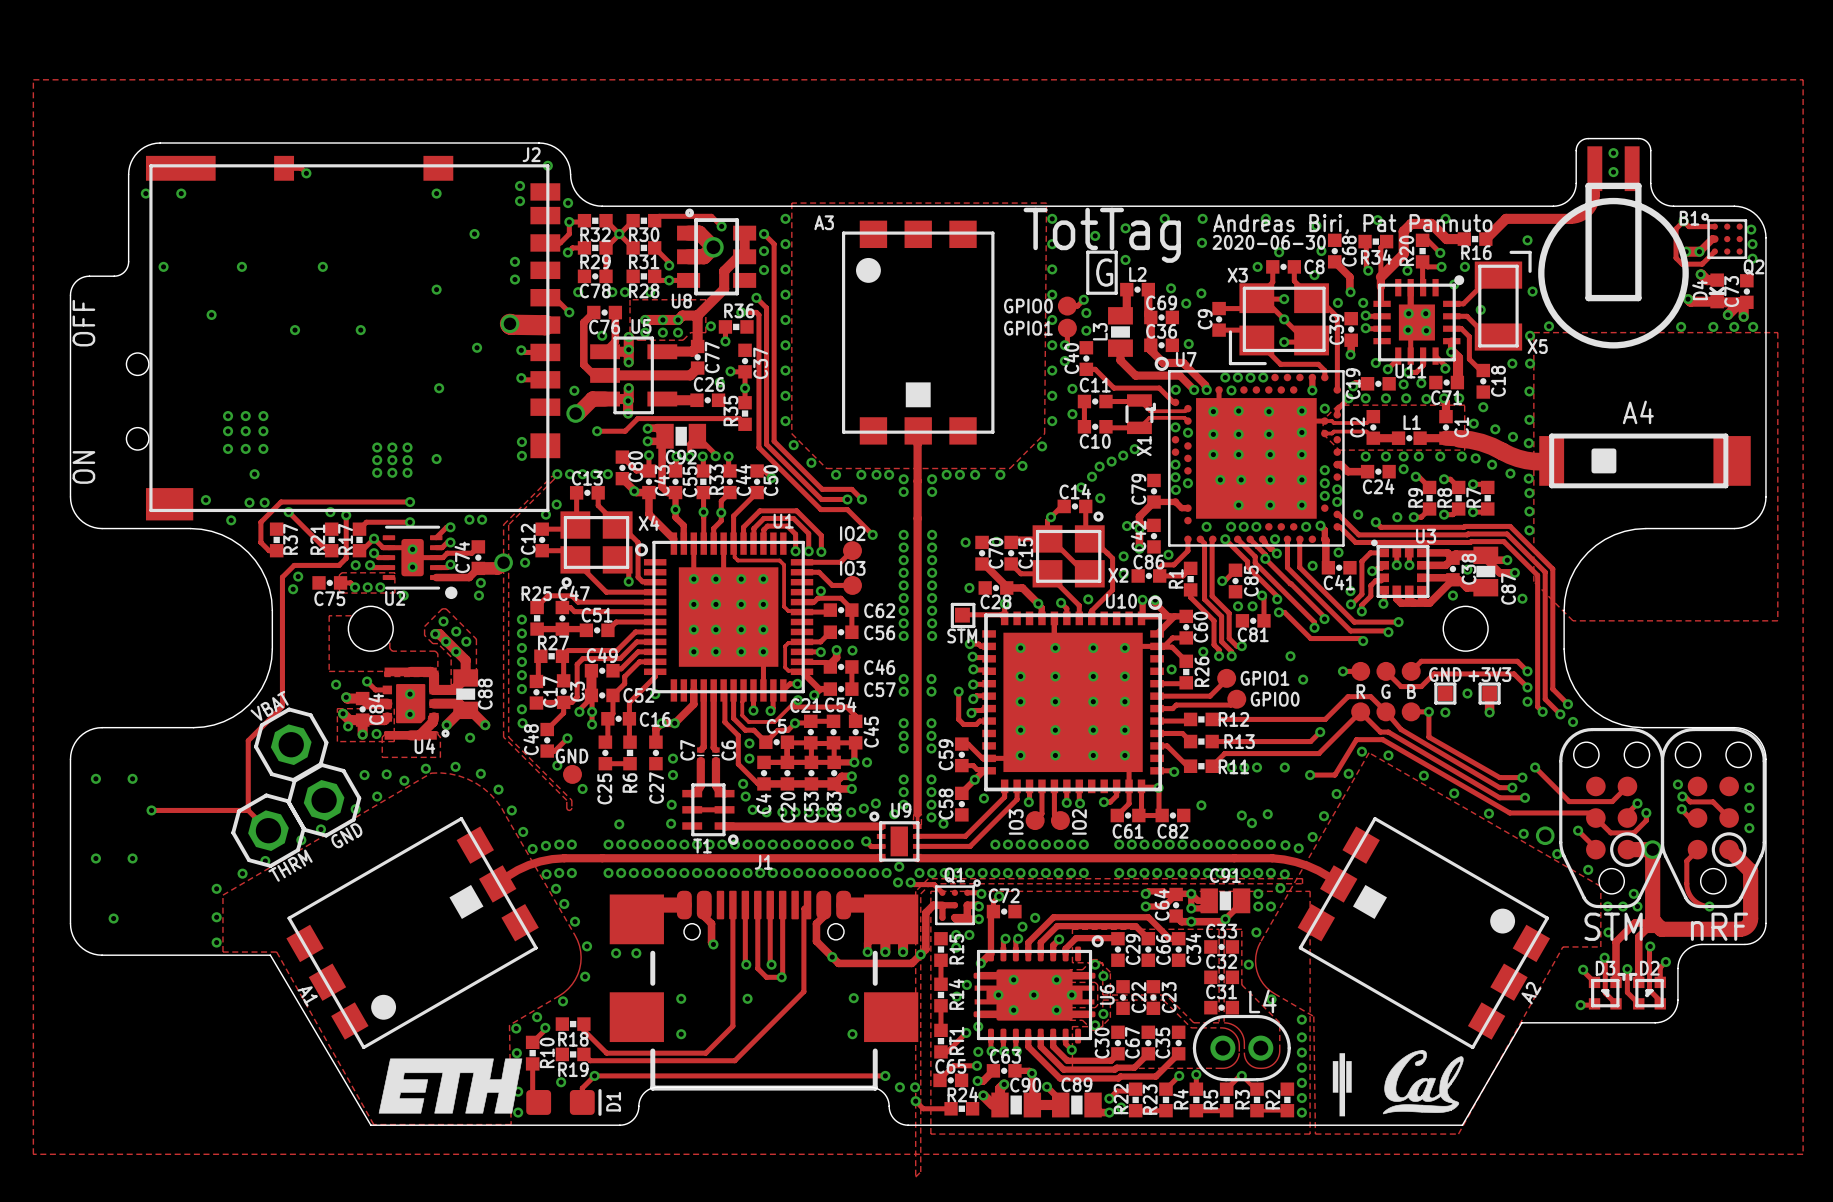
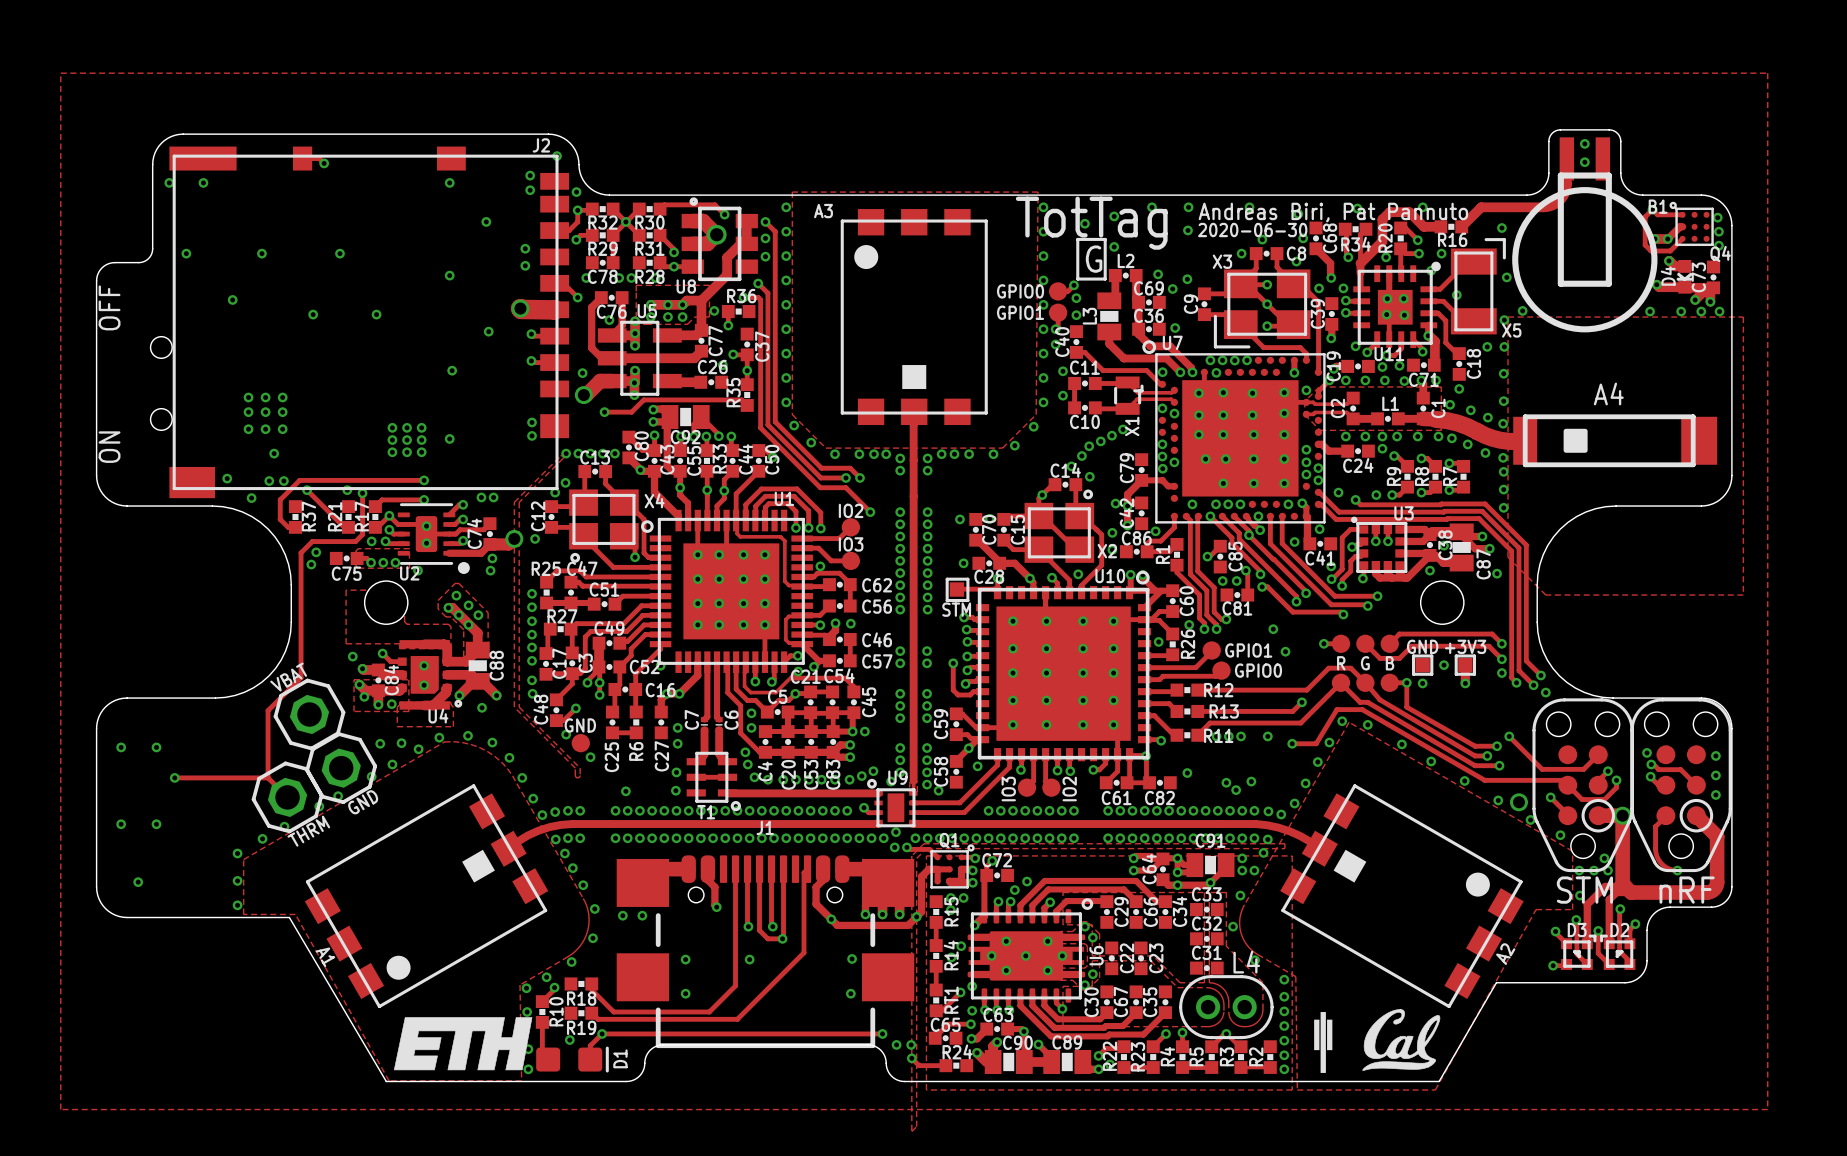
Q2 name: Q2 (1754, 267) -> Q4 (1720, 253)

